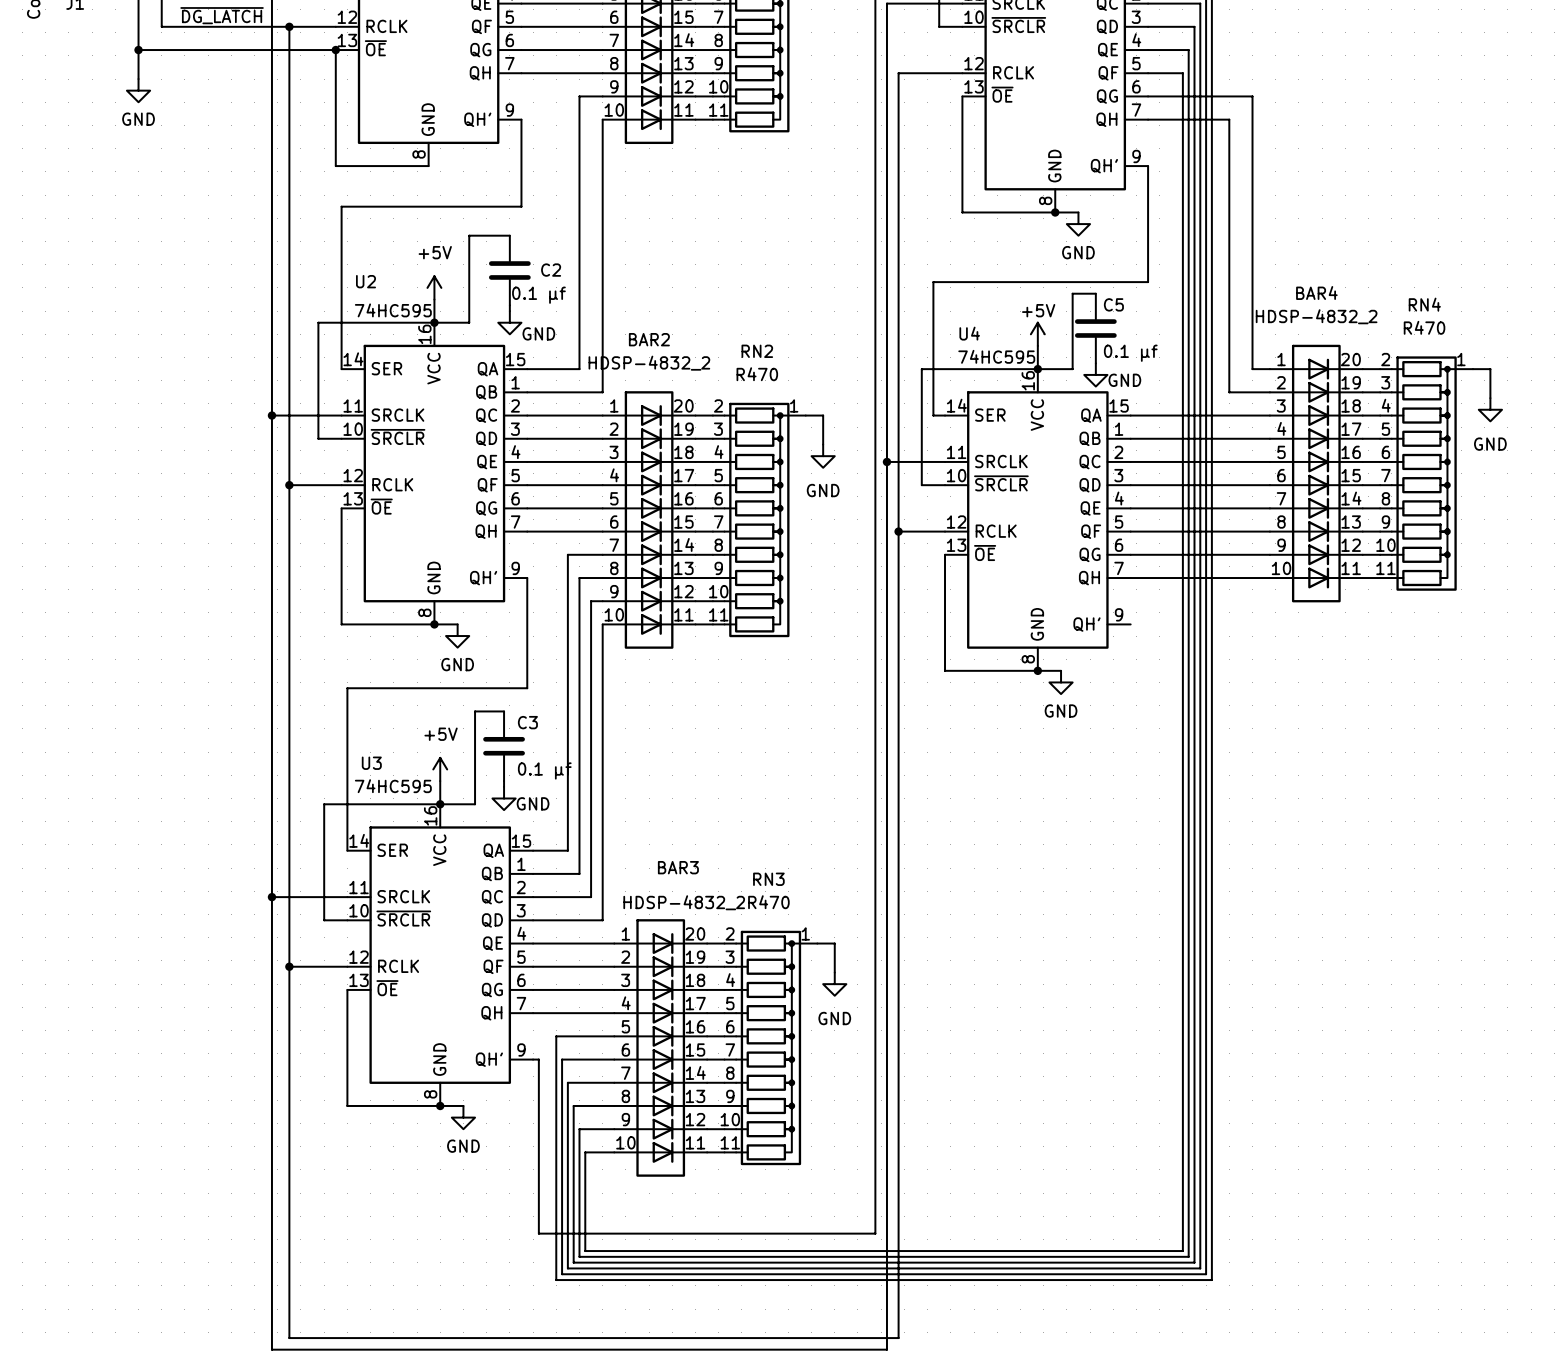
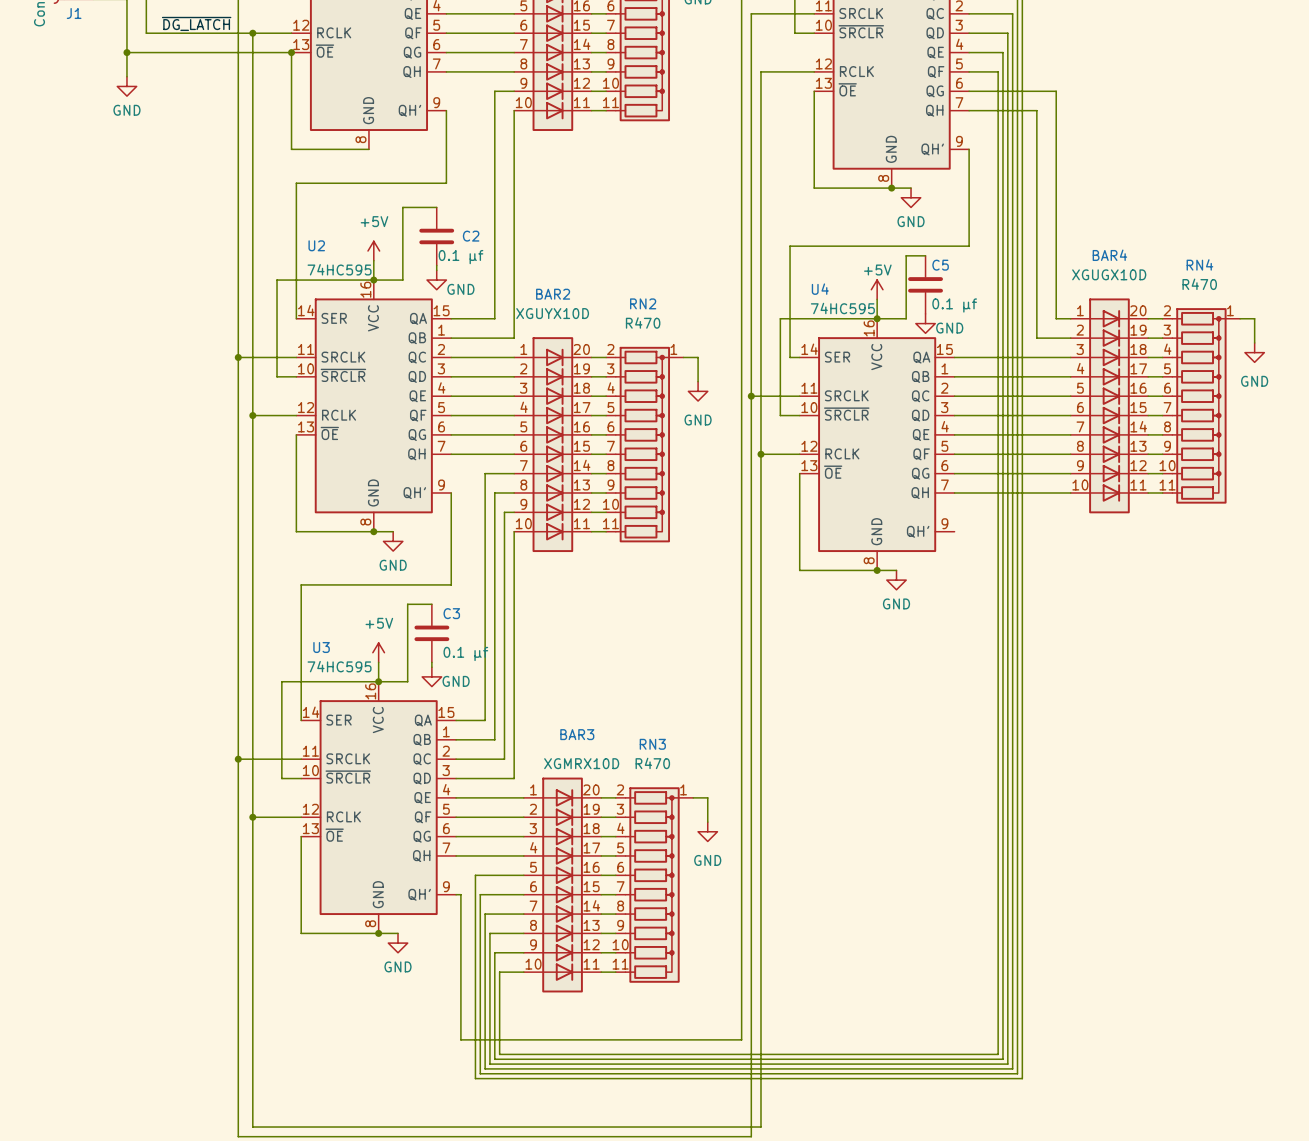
BAR4 value: HDSP-4832_2 (1316, 316) -> XGUGX10D (1109, 274)
BAR2 value: HDSP-4832_2 (649, 363) -> XGUYX10D (552, 313)
BAR3 value: HDSP-4832_2 (684, 902) -> XGMRX10D (581, 763)

